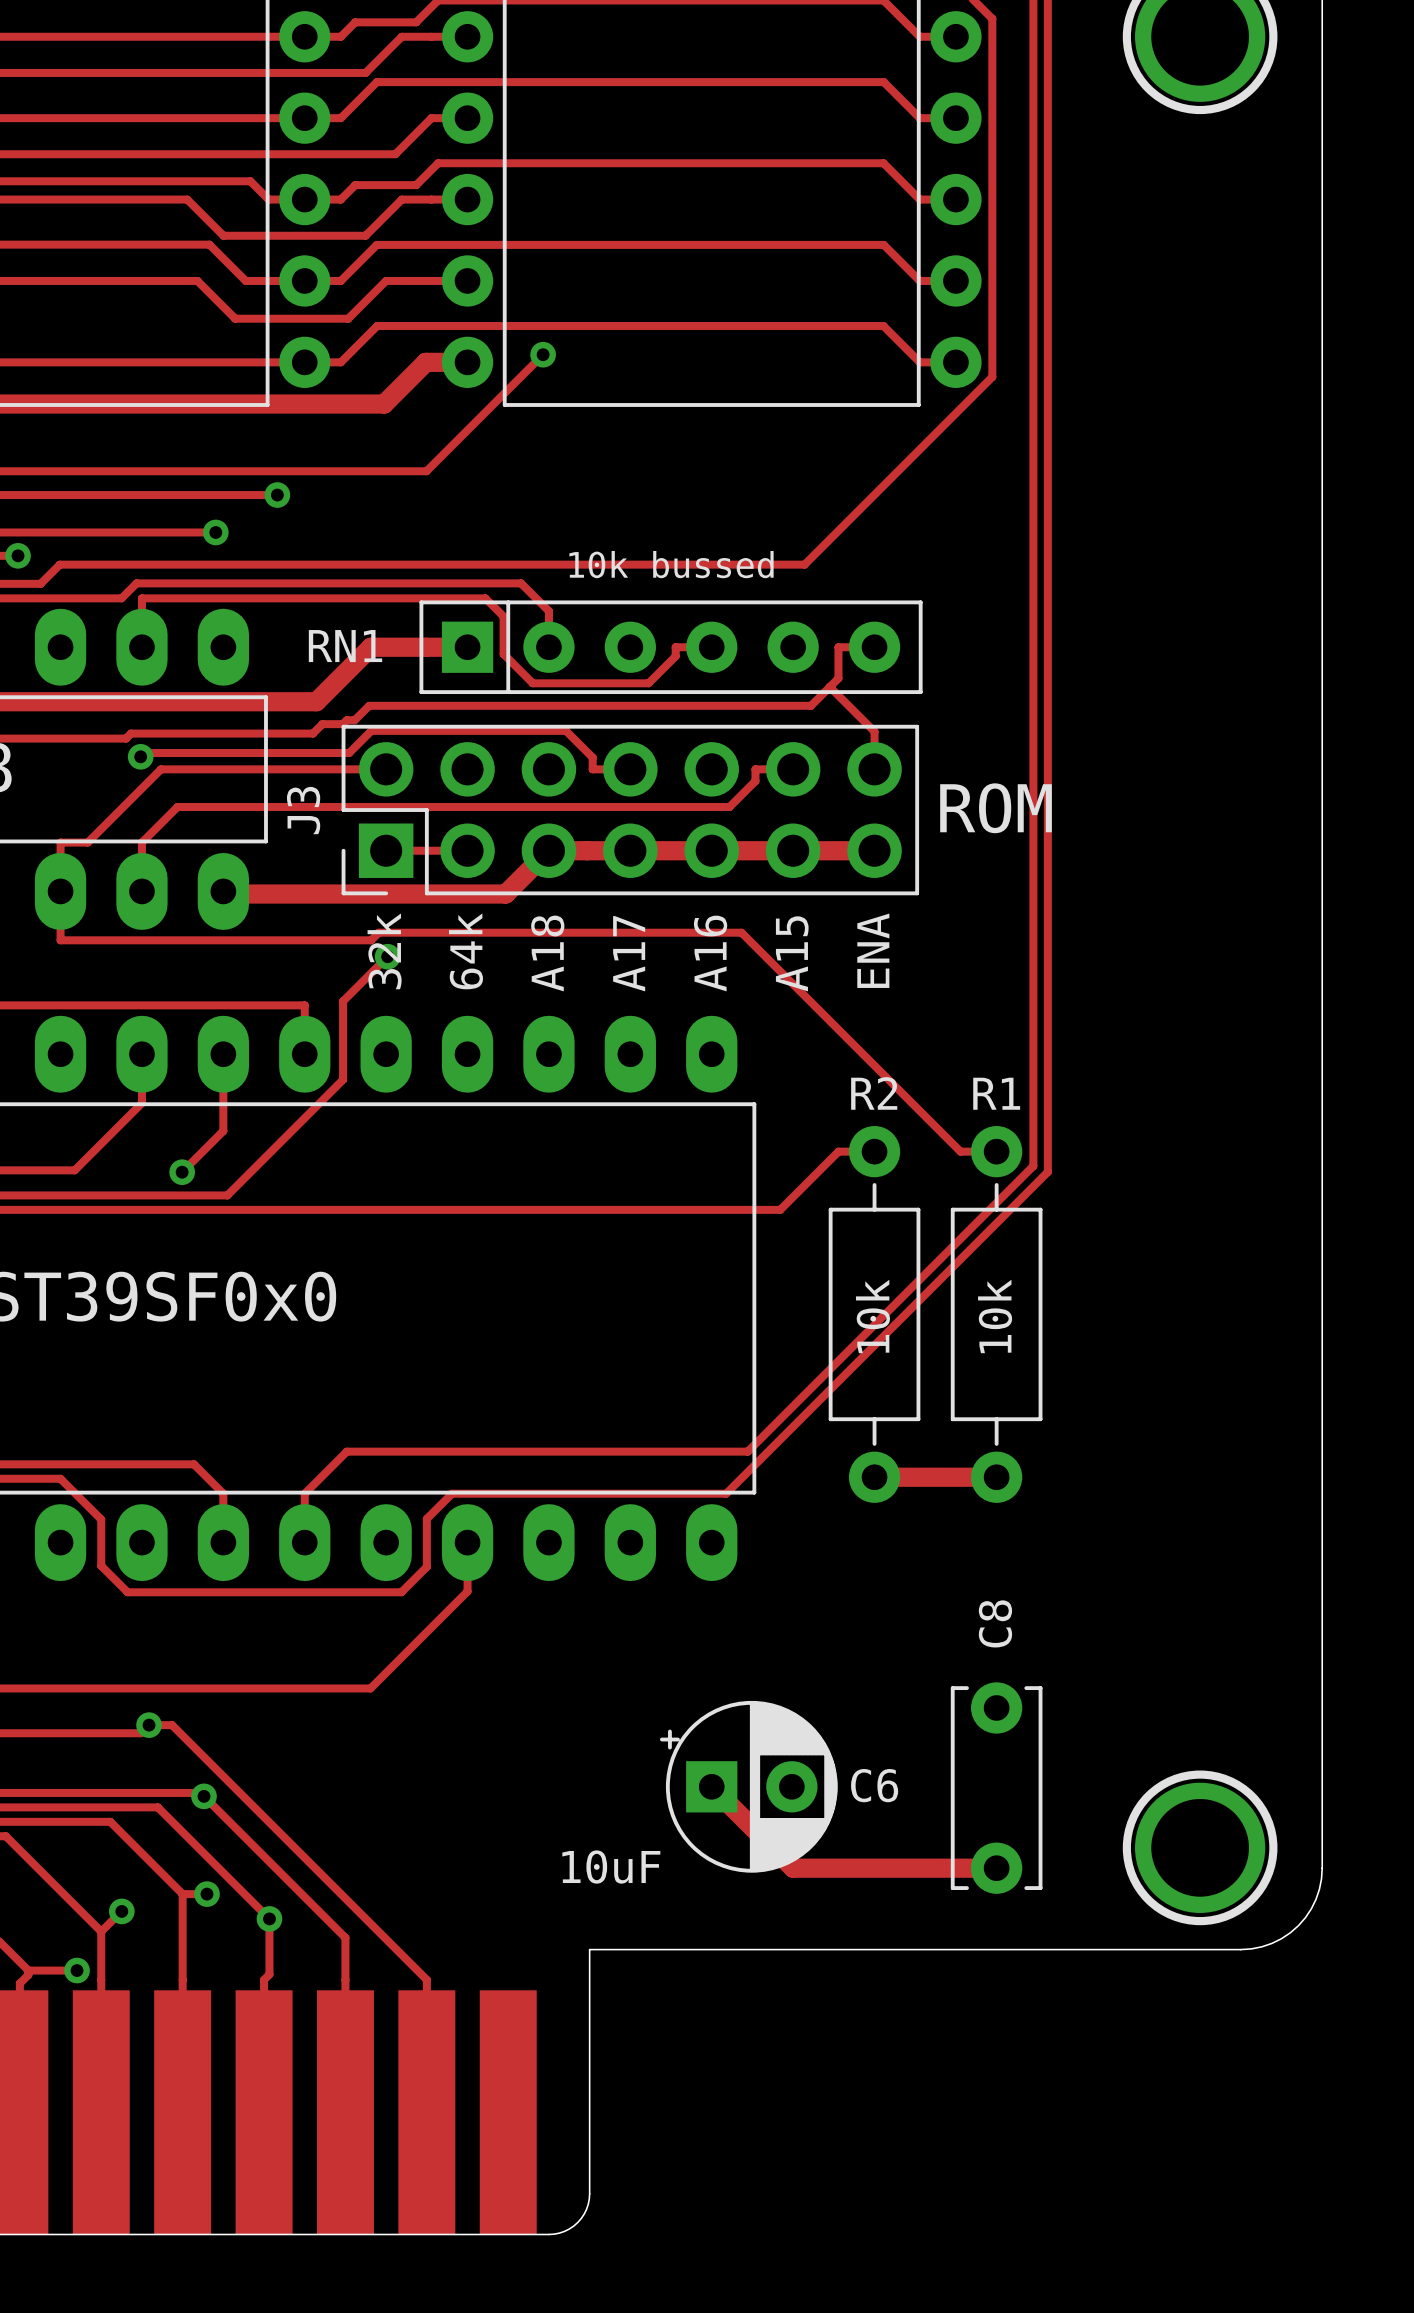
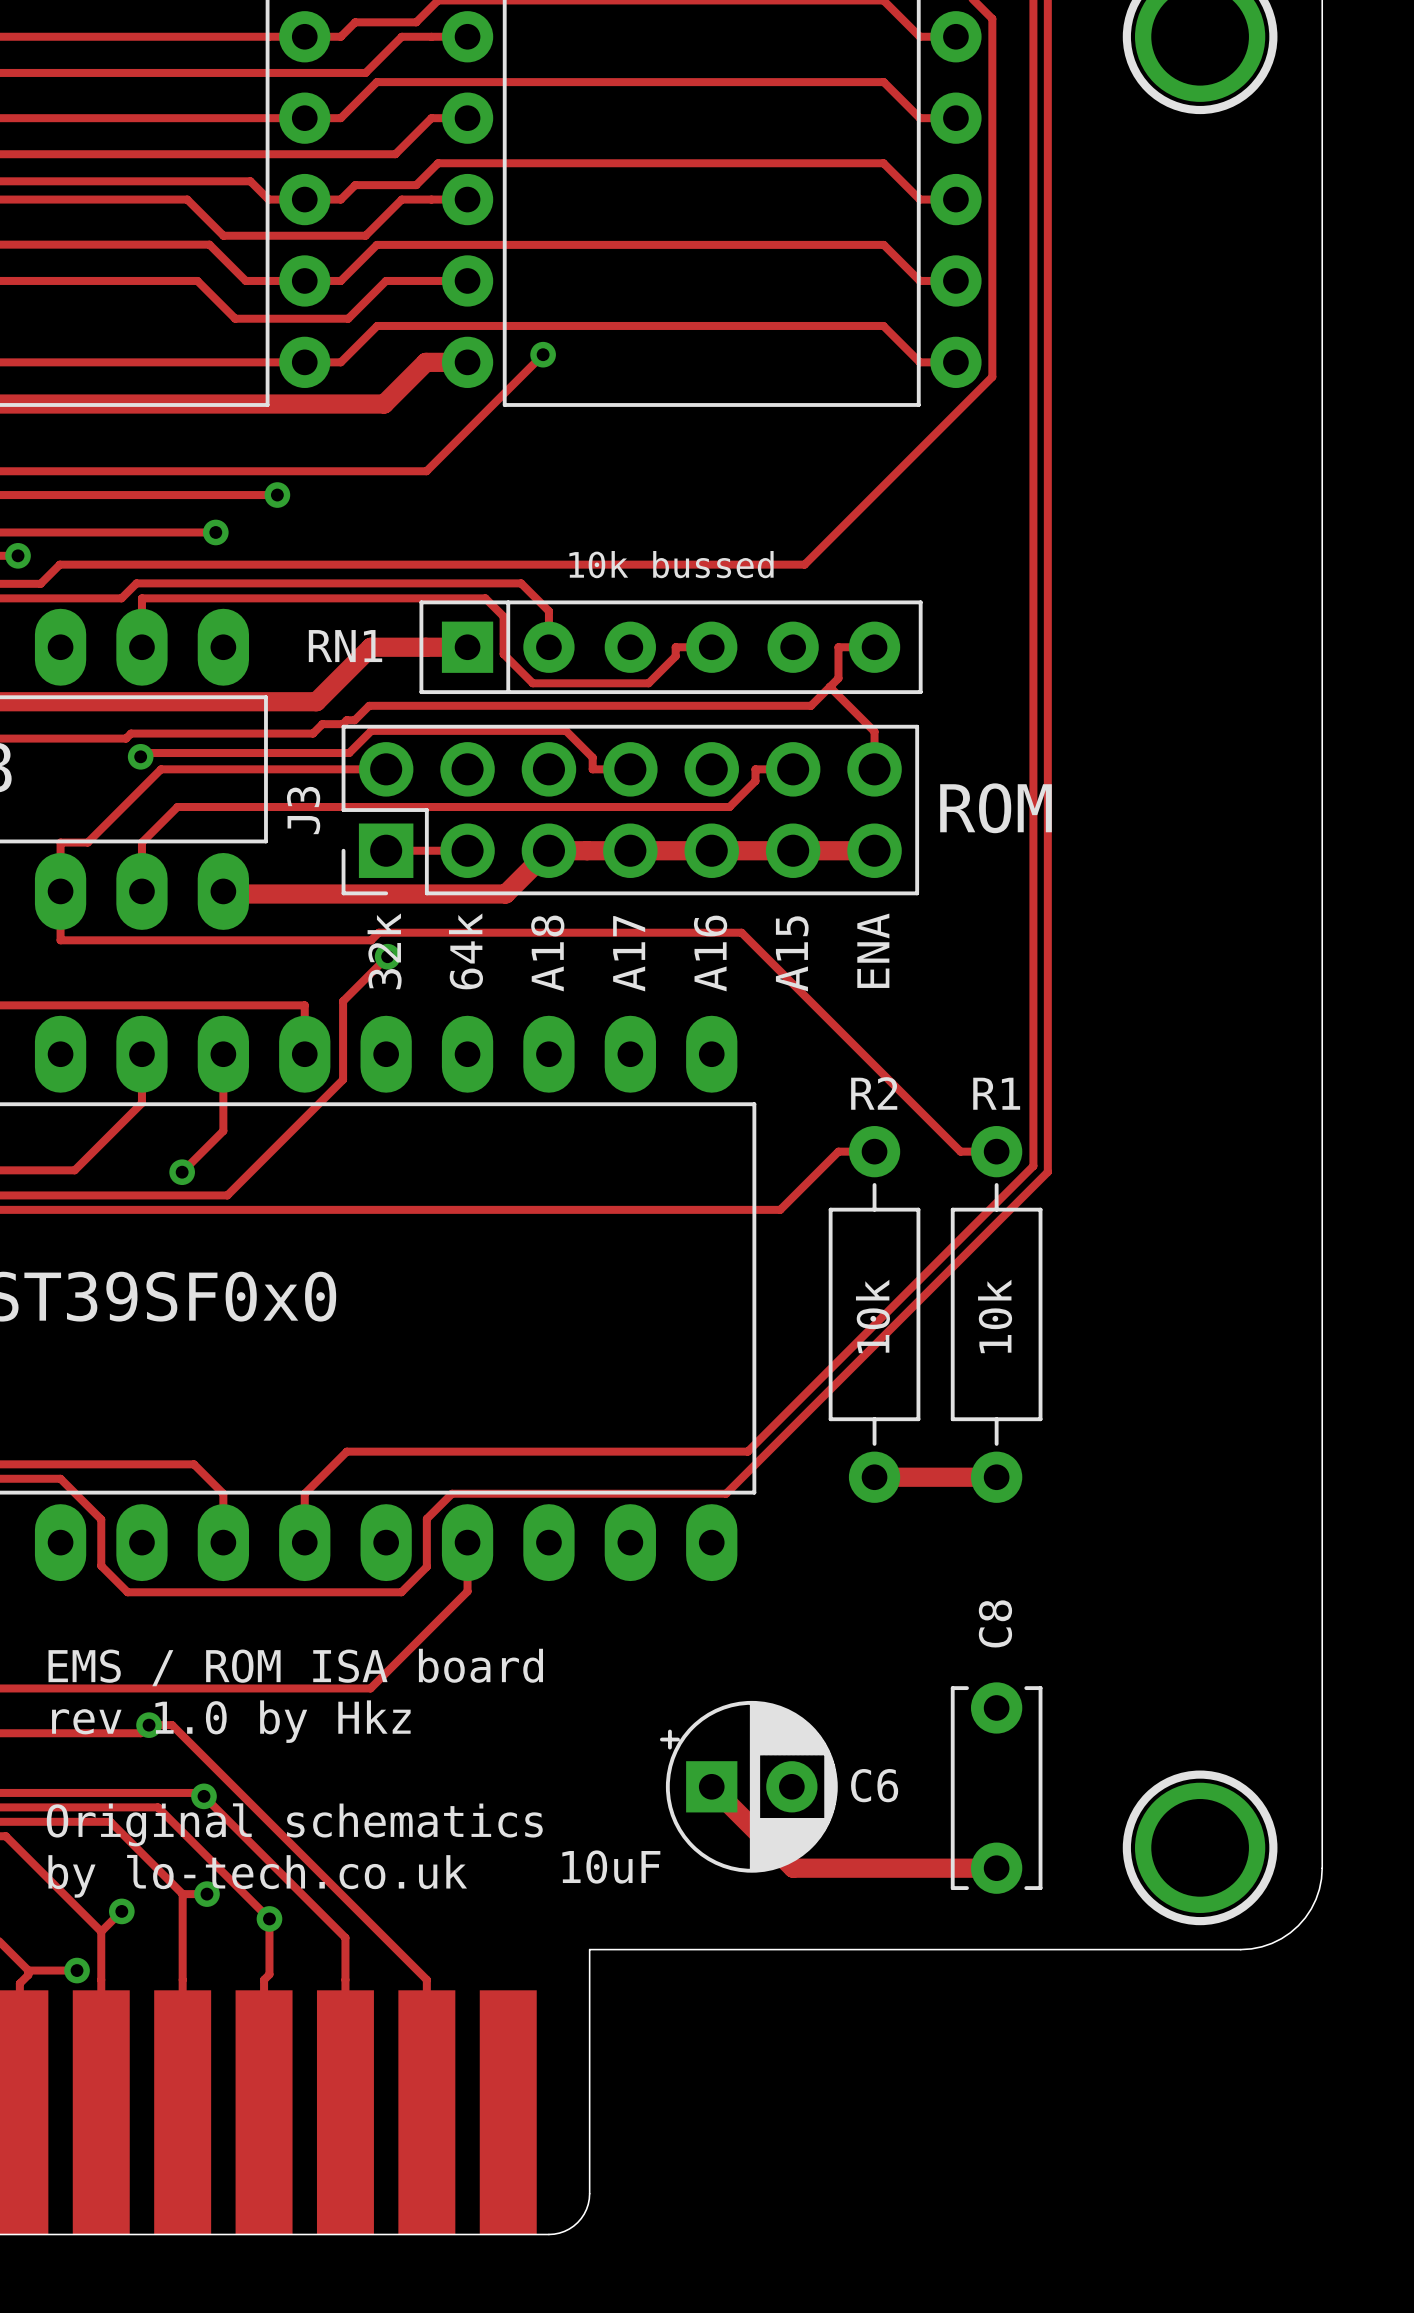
text: none -> EMS / ROM ISA board (295, 1667)
text: none -> rev 1.0 by Hkz (231, 1721)
text: none -> Original schematics (294, 1824)
text: none -> by lo-tech.co.uk (257, 1876)

